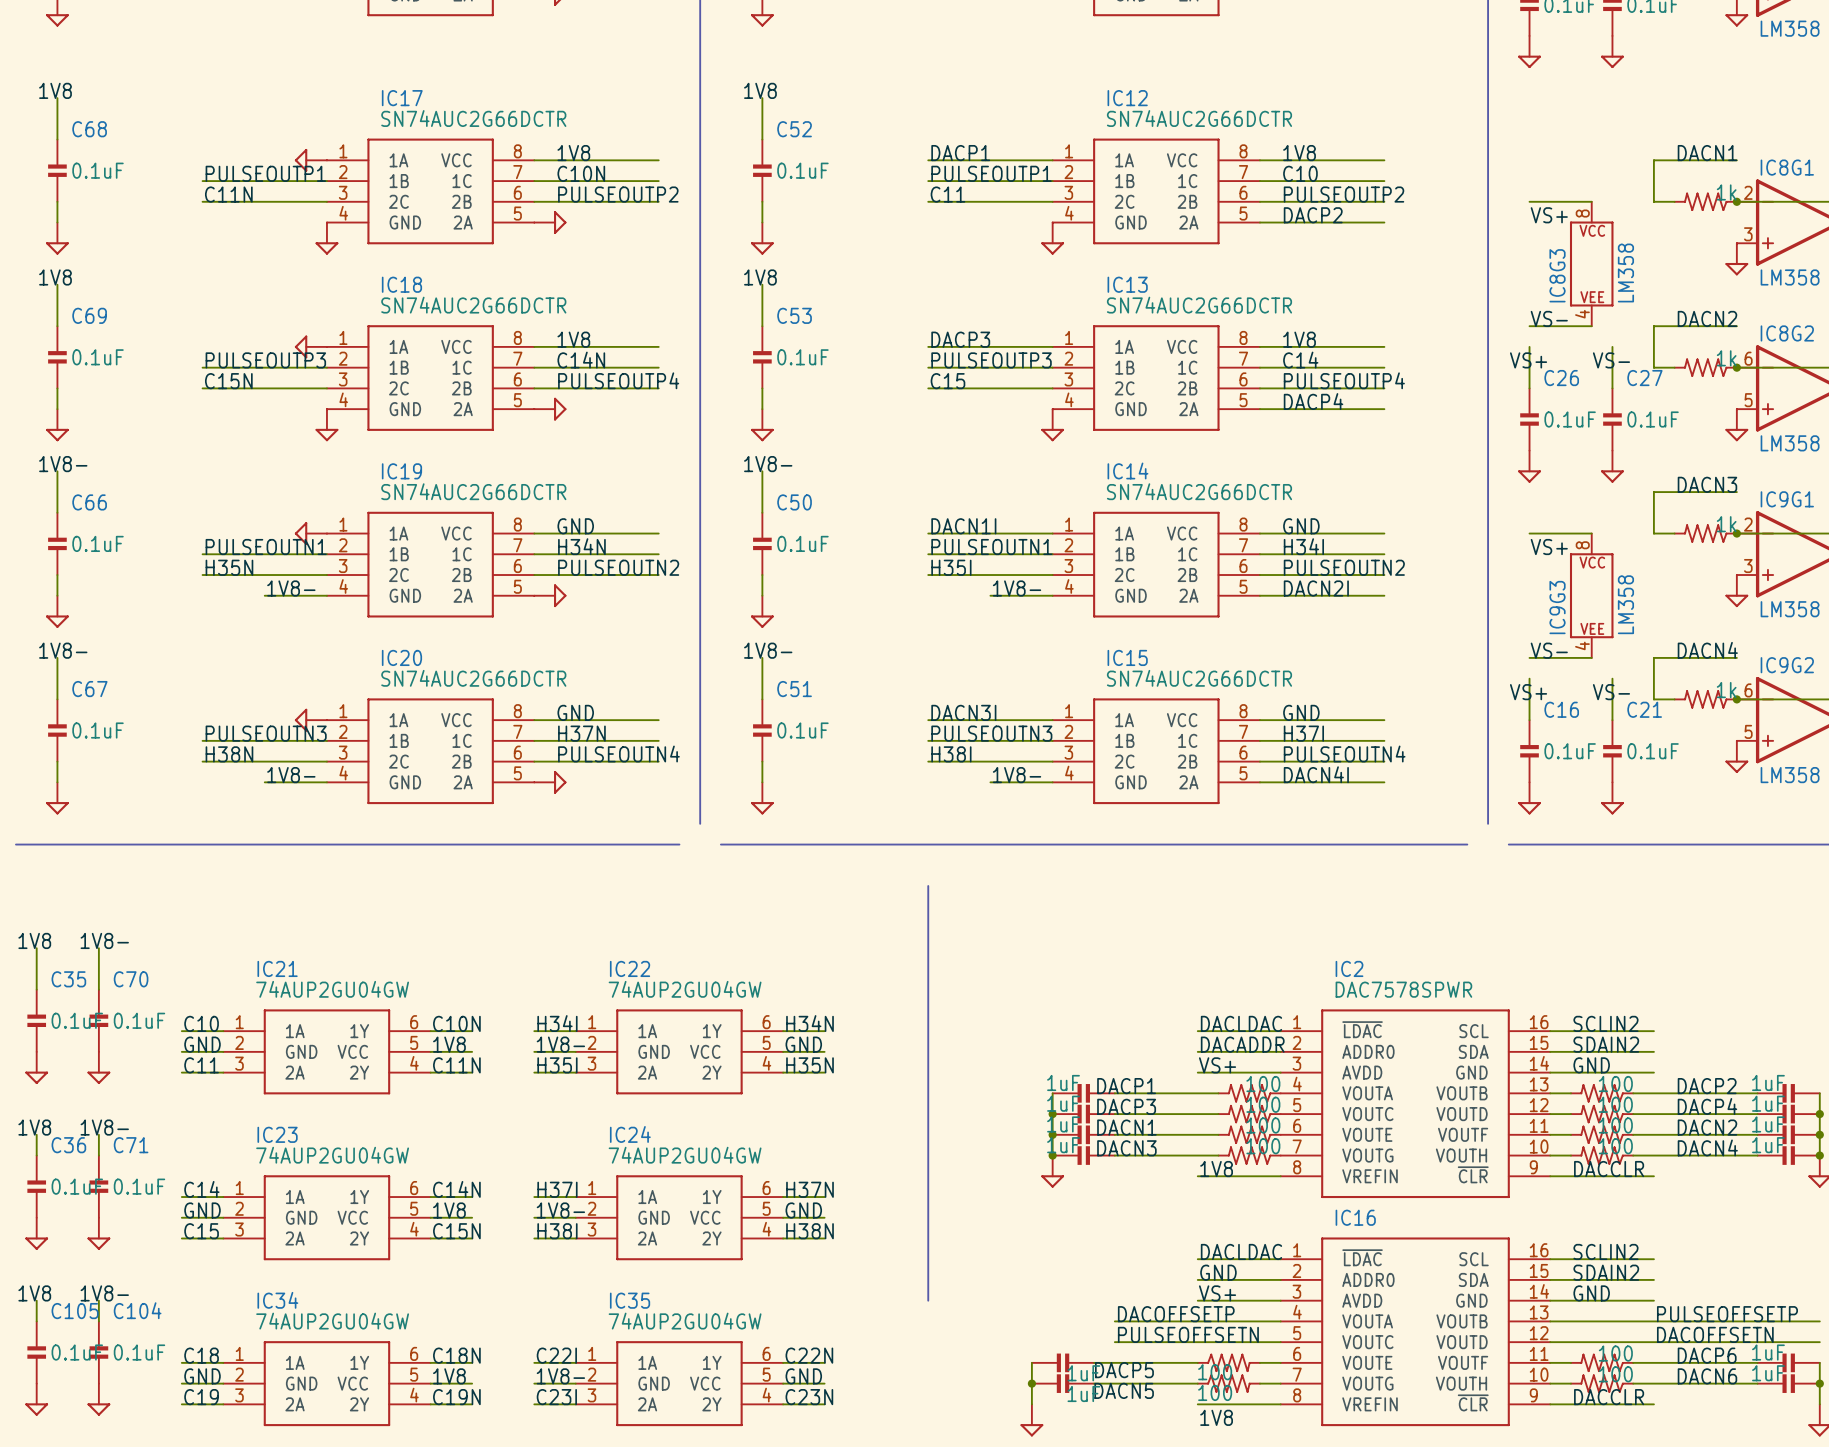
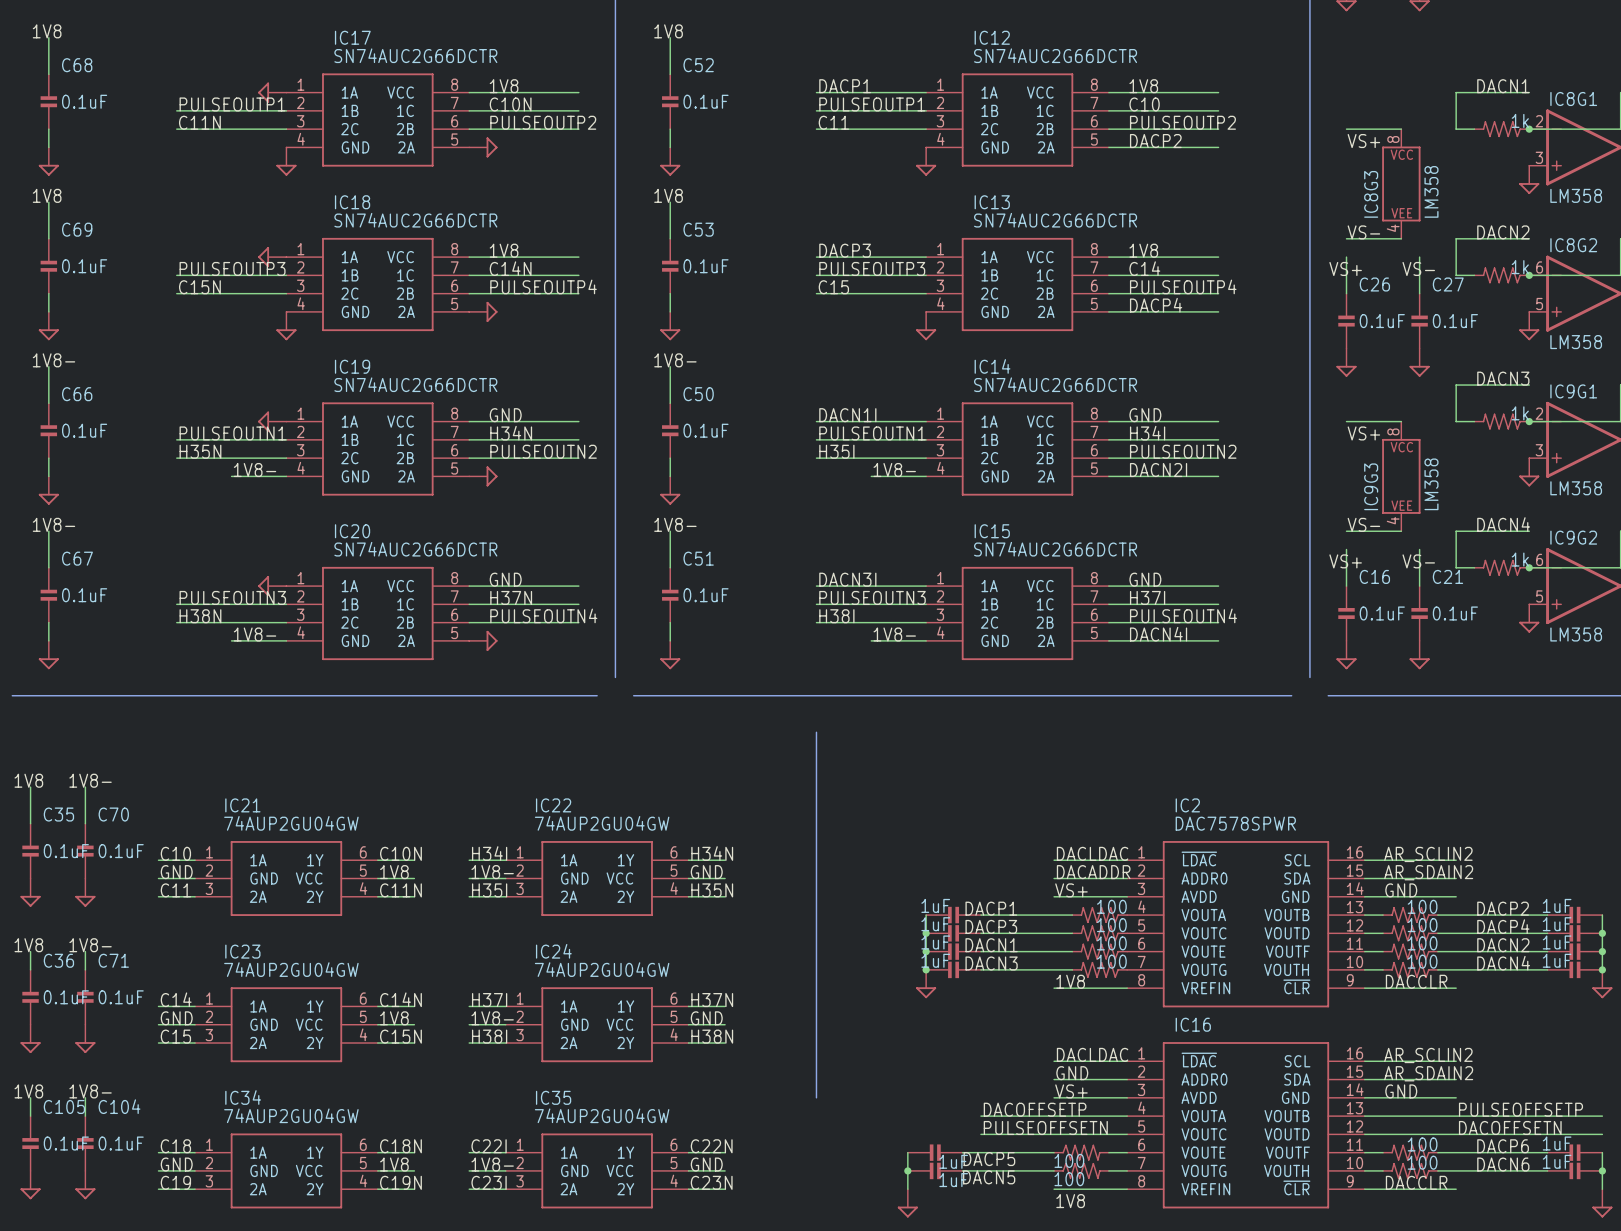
label: SCLIN2 (1605, 1023) -> AR_SCLIN2 (1428, 854)
label: SDAIN2 (1606, 1044) -> AR_SDAIN2 (1428, 872)
label: SCLIN2 (1605, 1251) -> AR_SCLIN2 (1428, 1055)
label: SDAIN2 (1606, 1272) -> AR_SDAIN2 (1428, 1073)

